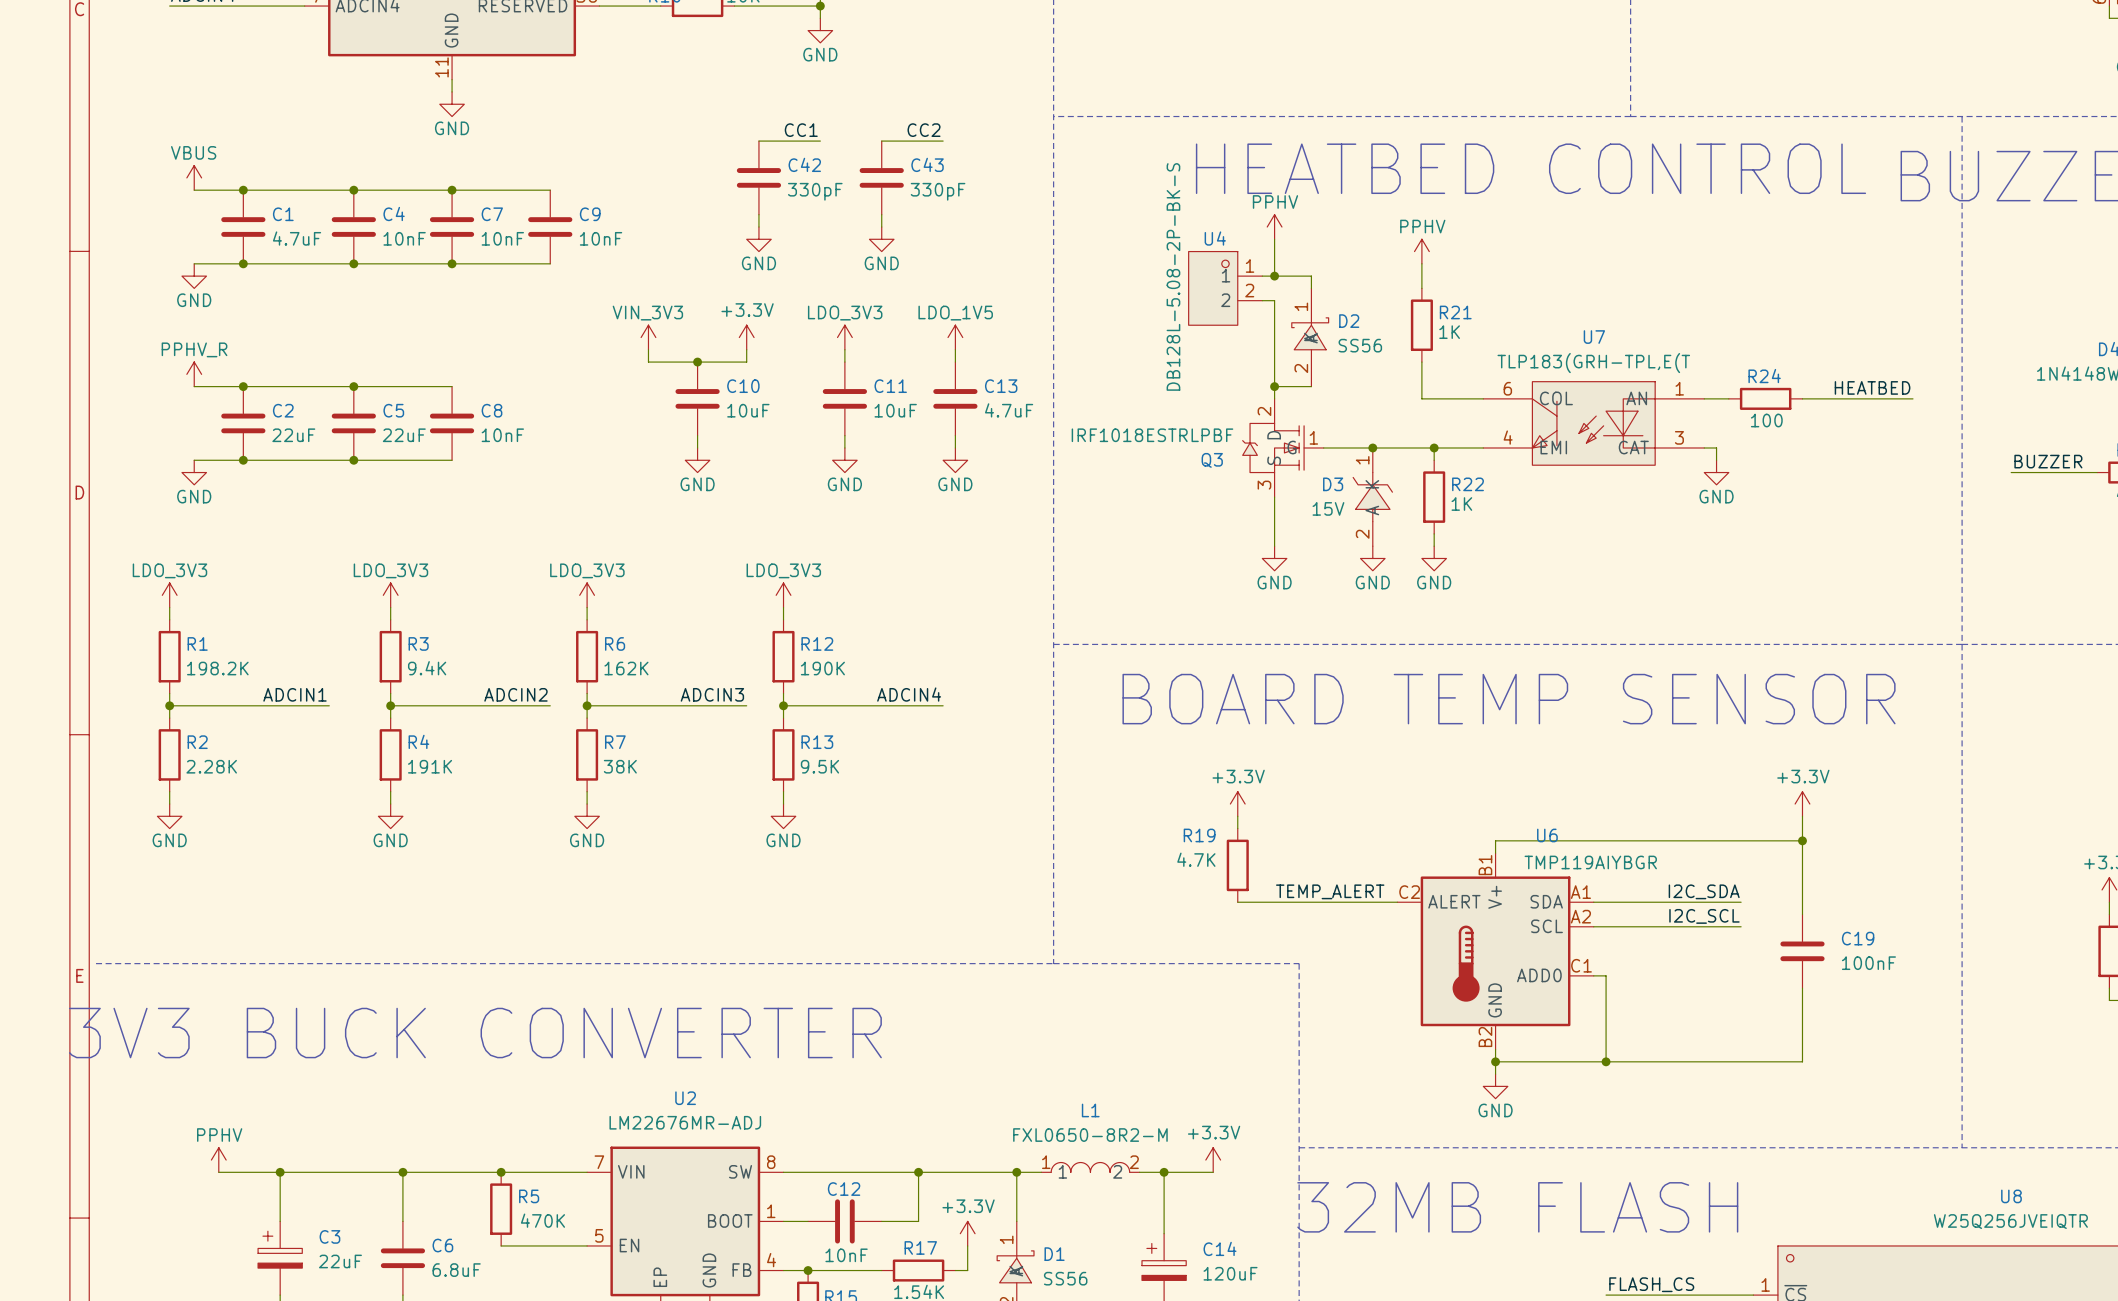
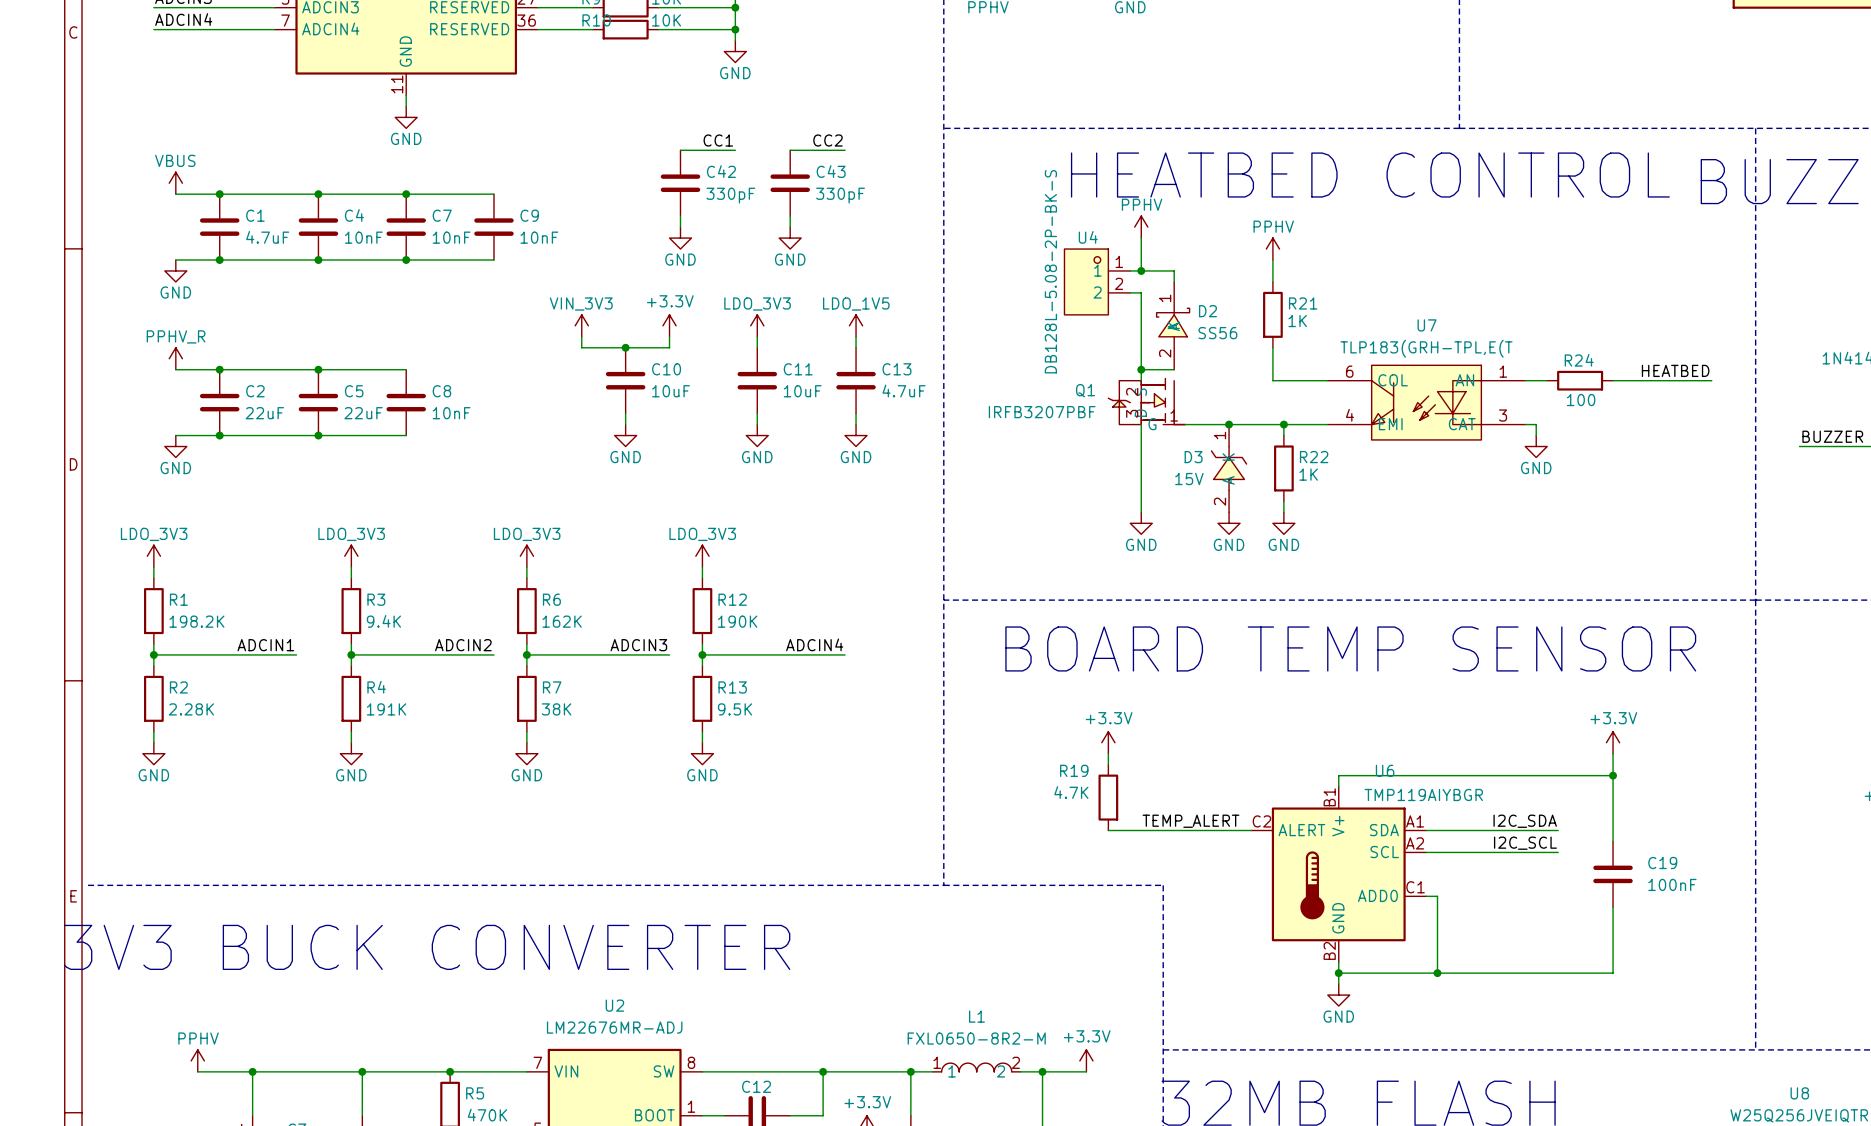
Q1: none -> IRFB3207PBF (1146, 401)
Q3: IRF1018ESTRLPBF (1283, 447) -> none

